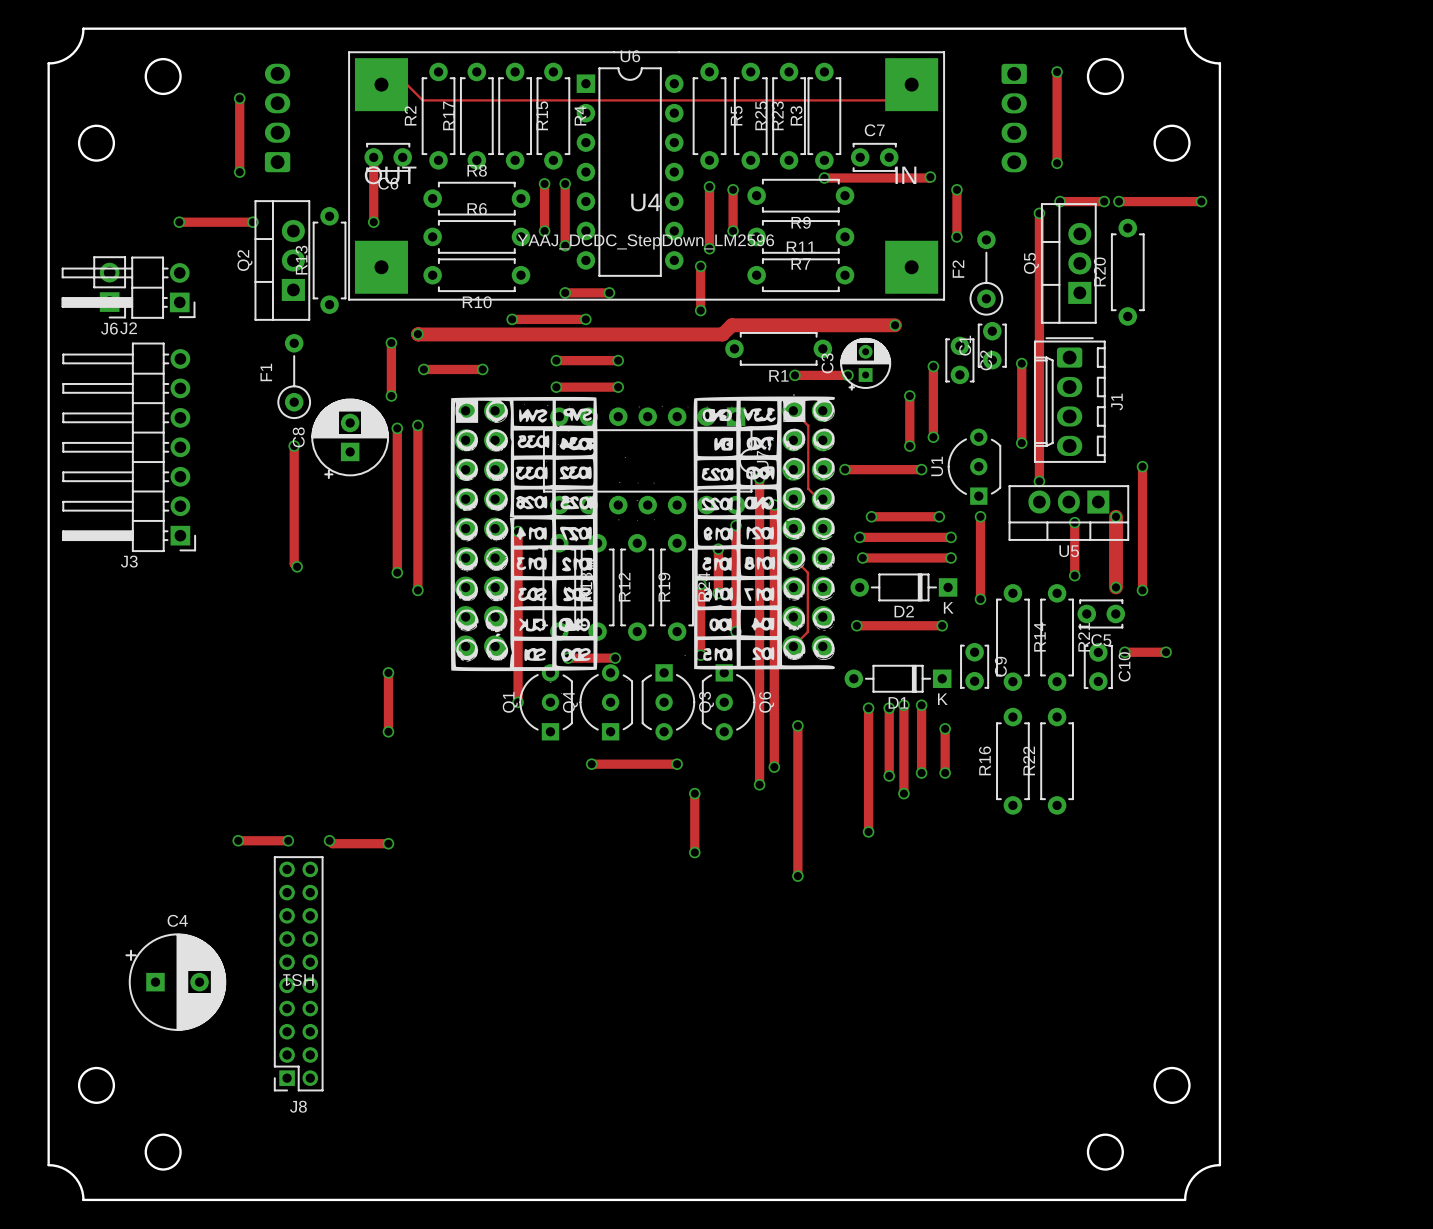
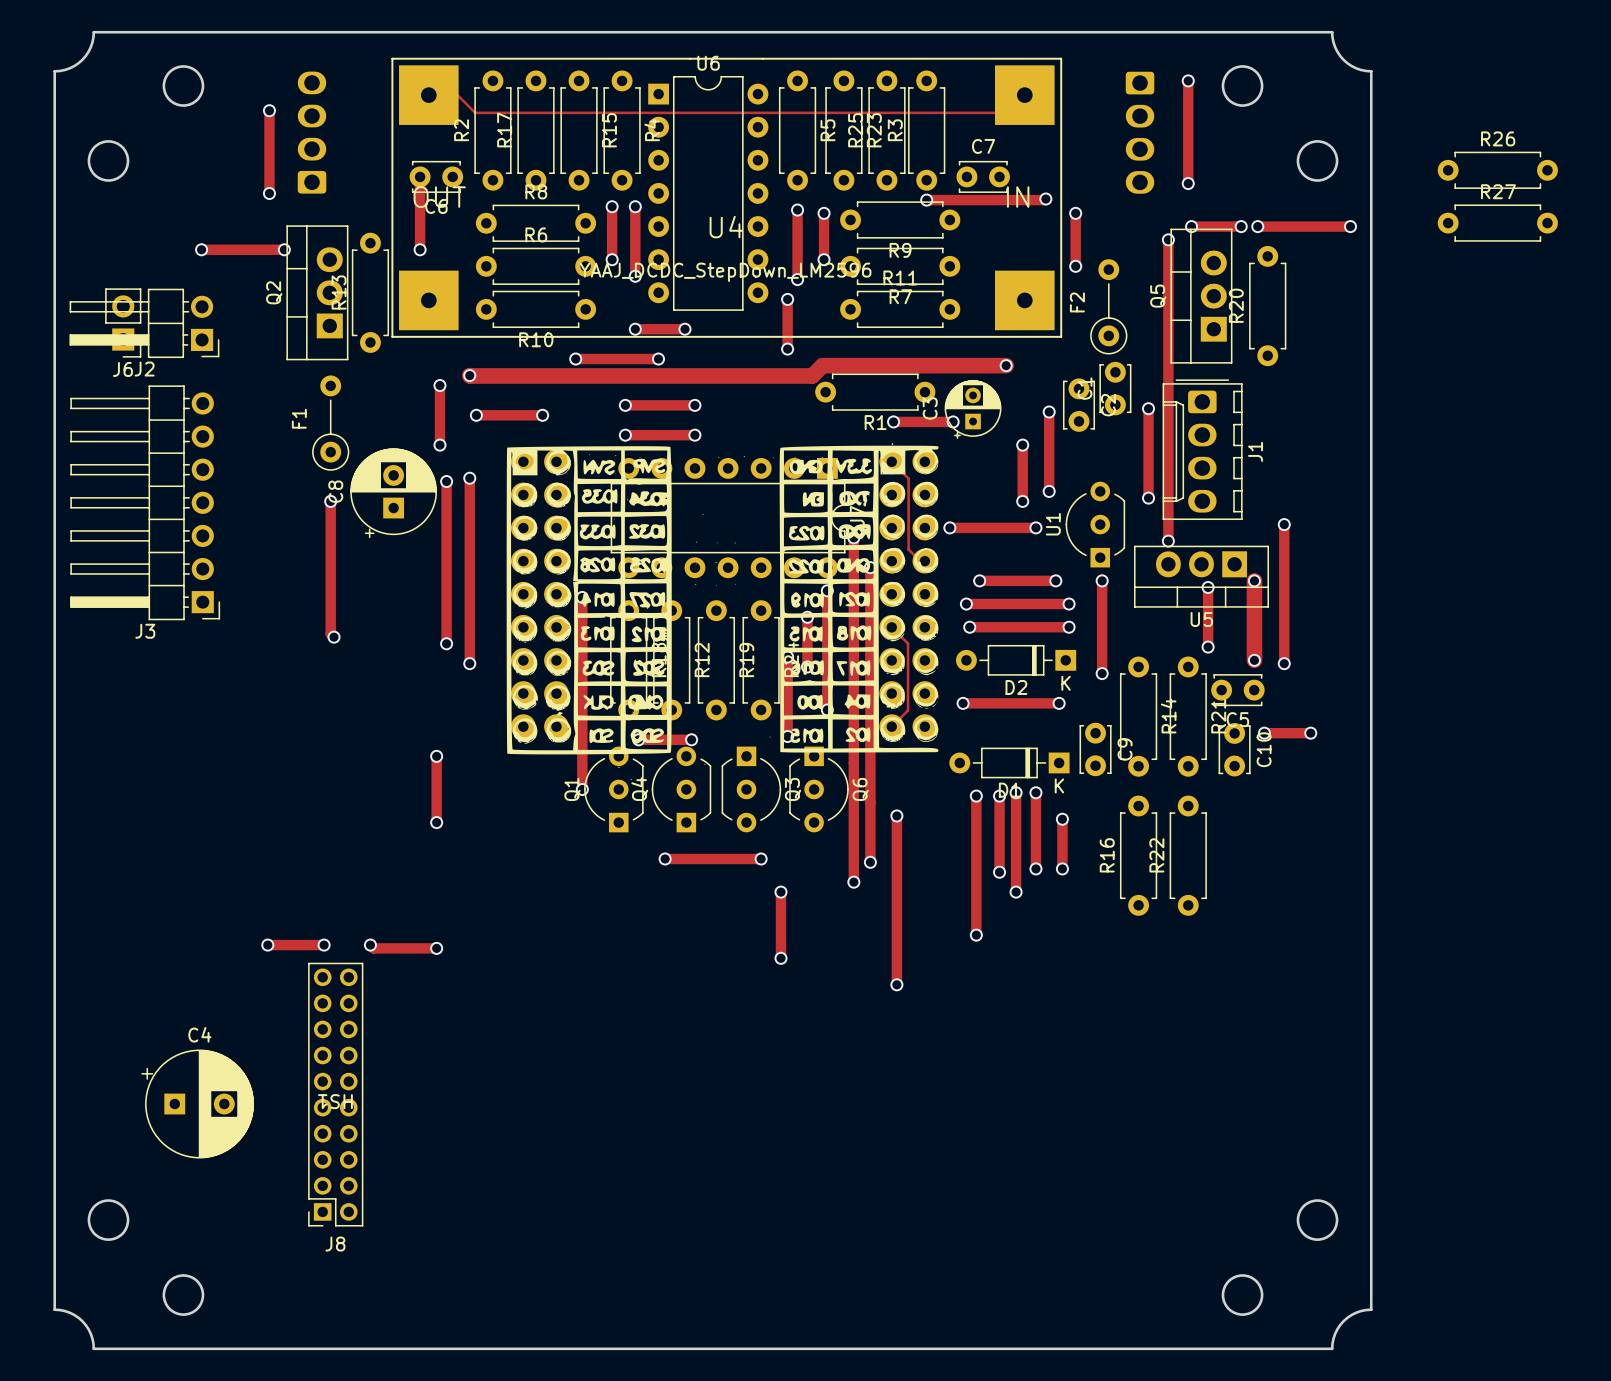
R26: none -> (1497, 170)
R27: none -> (1497, 223)

